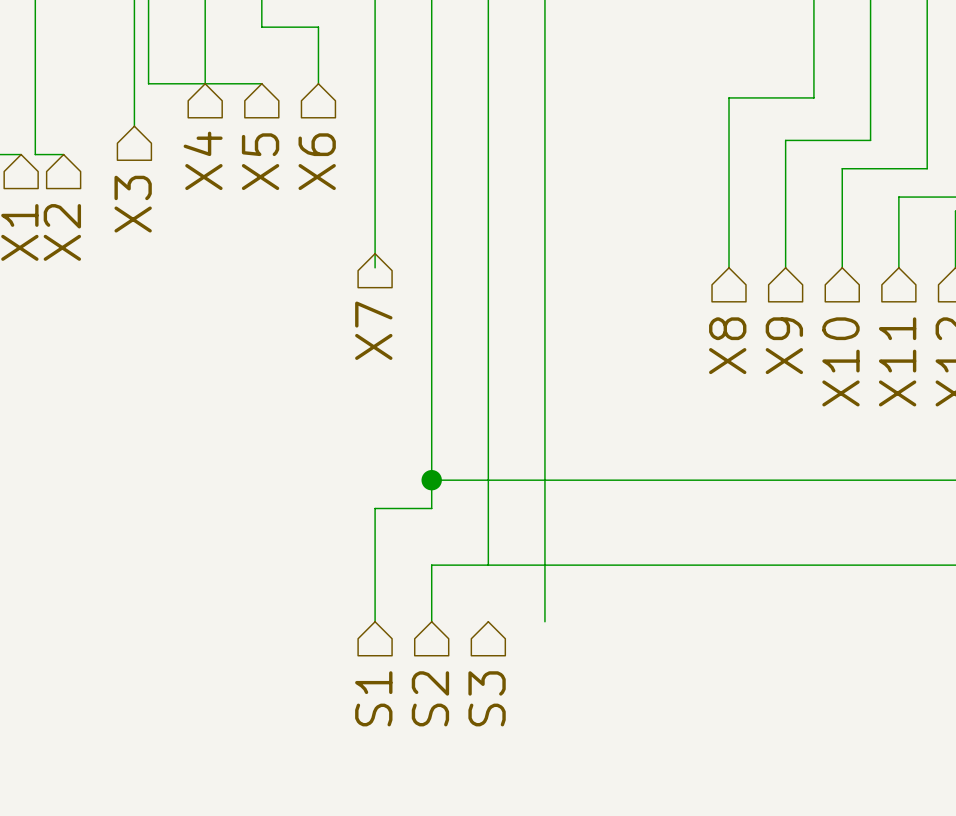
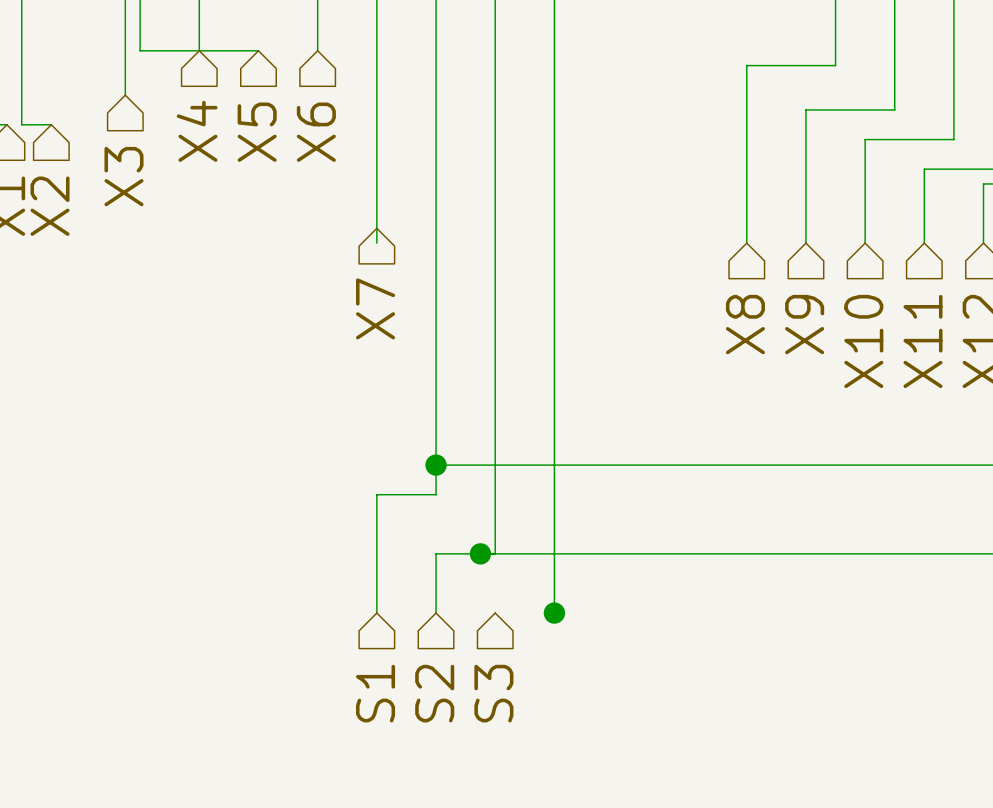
junction: none -> (480, 553)
junction: none -> (554, 613)

